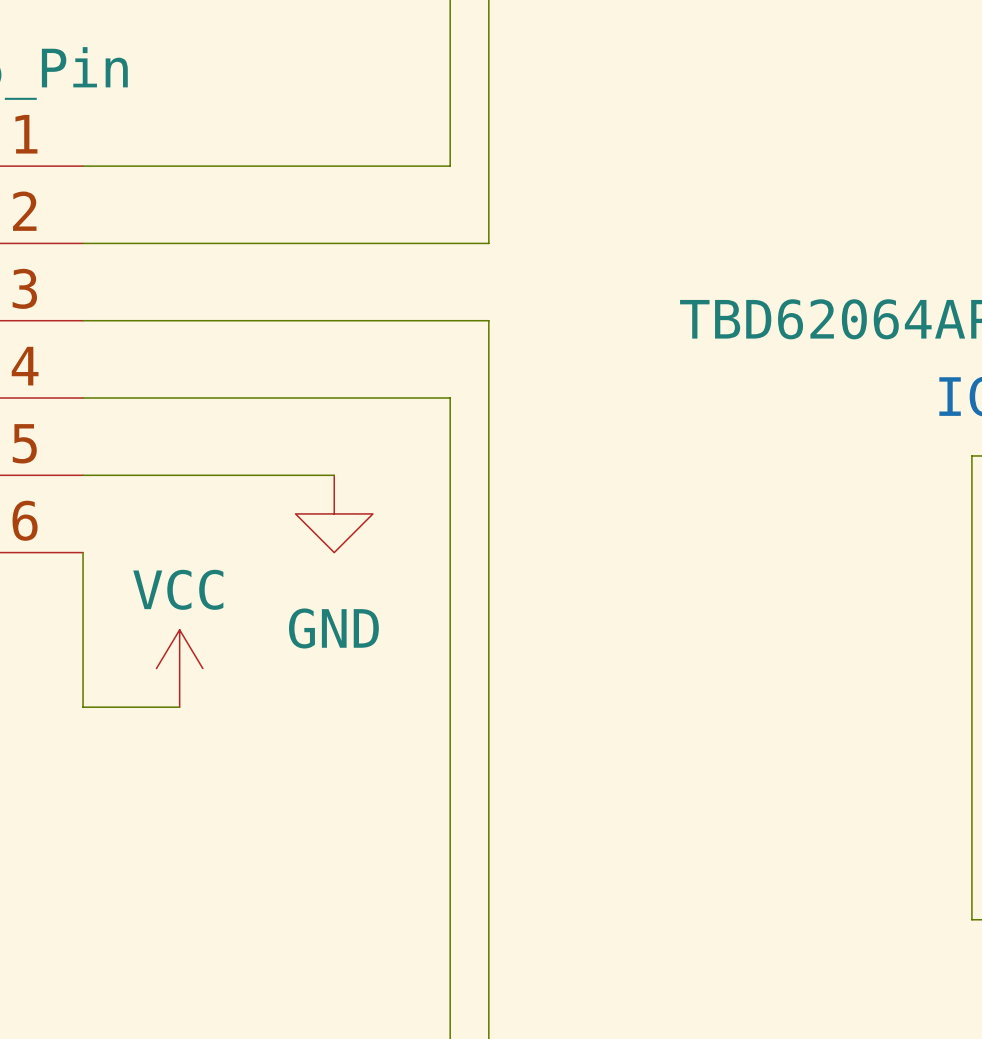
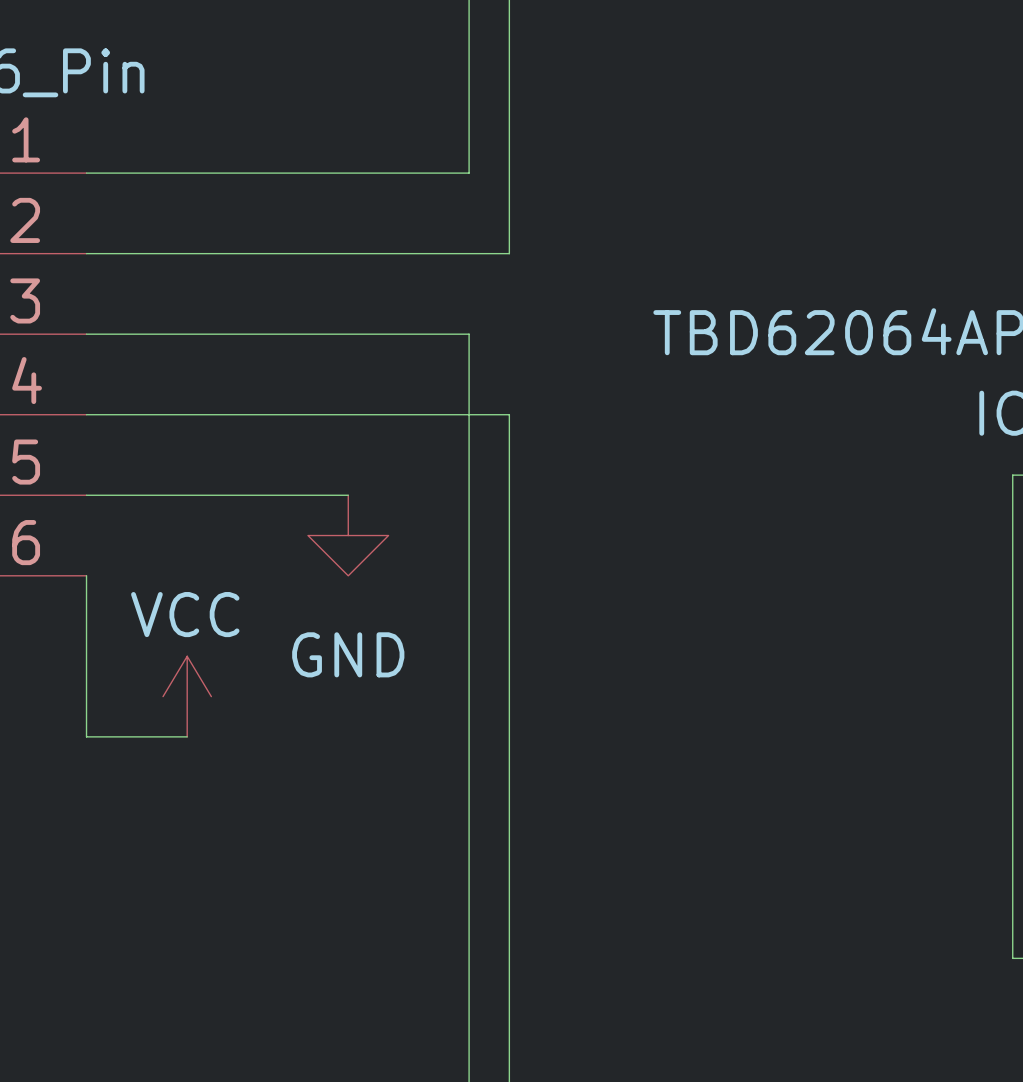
wire: (450, 320) (488, 320) (488, 398) -> (469, 334) (469, 414) (509, 414)

